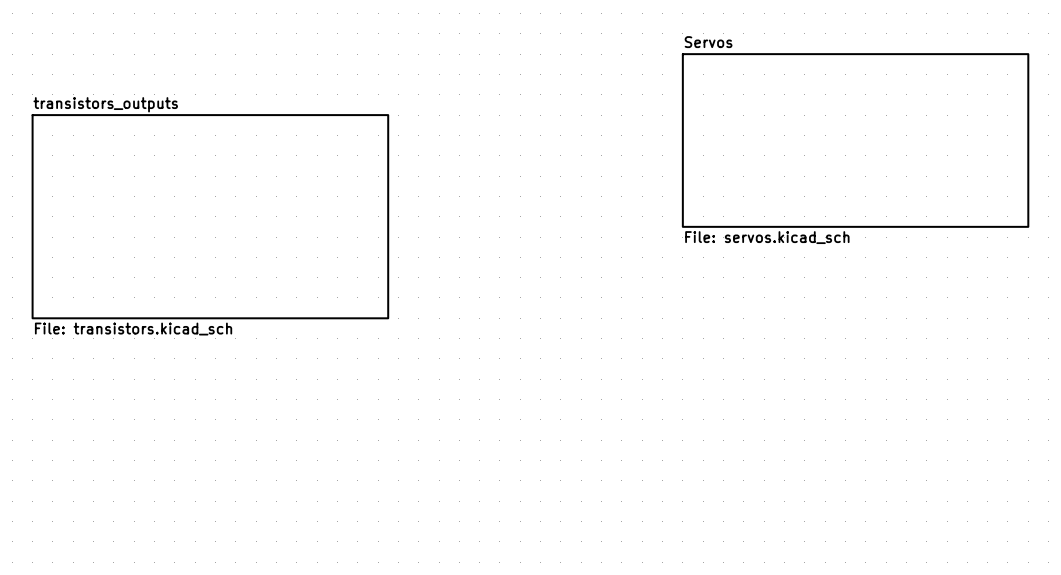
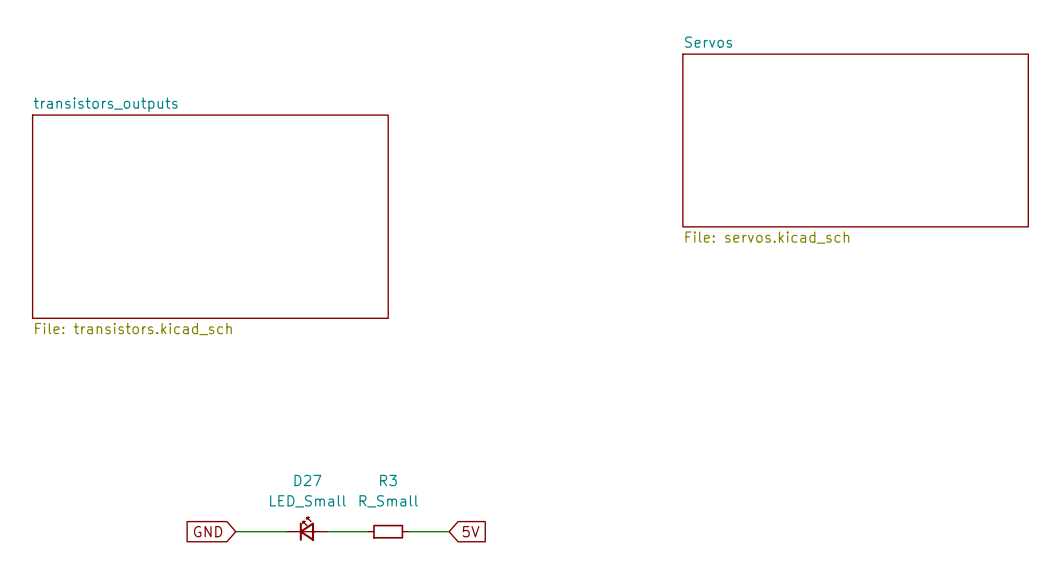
D27: none -> LED_Small (306, 529)
global label: none -> GND (208, 531)
wire: none -> (235, 531) (286, 531)
wire: none -> (327, 531) (367, 531)
R3: none -> R_Small (388, 531)
wire: none -> (408, 531) (449, 531)
global label: none -> 5V (471, 531)

